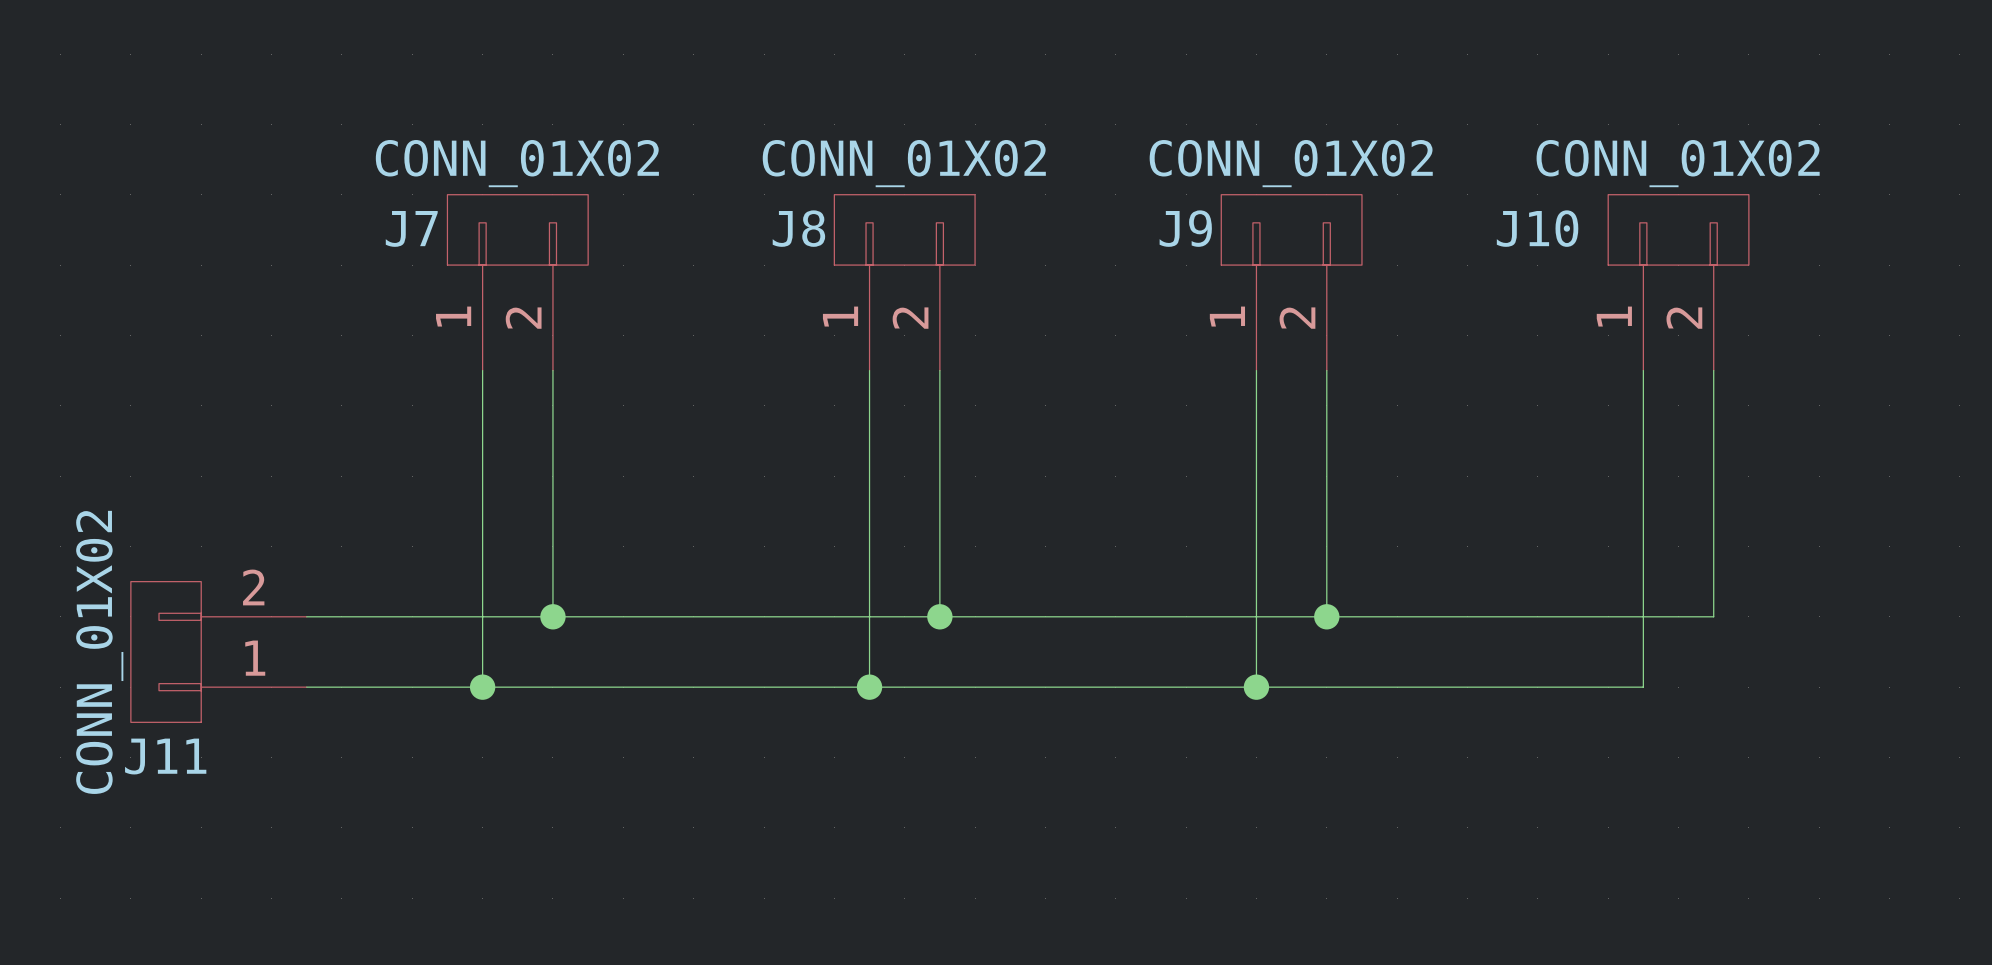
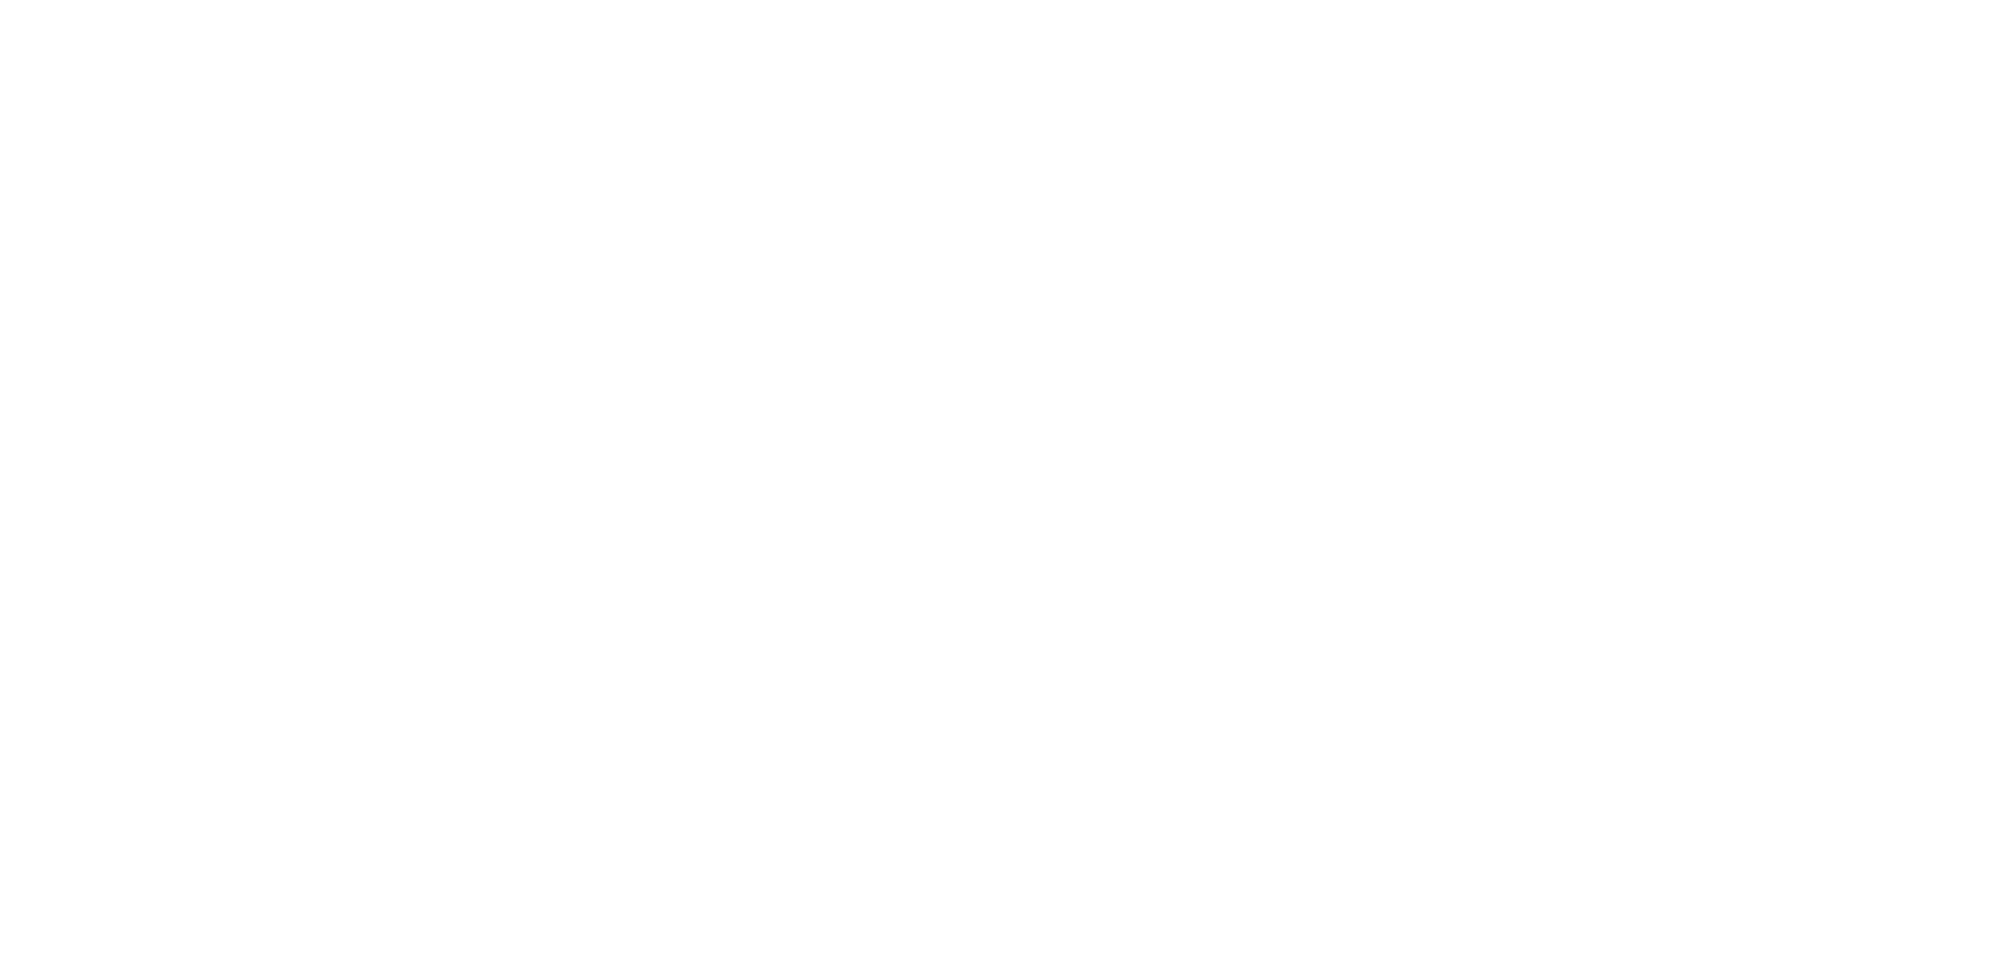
J7: CONN_01X02 (517, 282) -> none
J8: CONN_01X02 (904, 282) -> none
J9: CONN_01X02 (1291, 282) -> none
J10: CONN_01X02 (1678, 282) -> none
wire: (482, 370) (482, 687) -> none
wire: (552, 370) (552, 616) -> none
wire: (869, 370) (869, 687) -> none
wire: (939, 370) (939, 616) -> none
wire: (1256, 370) (1256, 687) -> none
wire: (1326, 370) (1326, 616) -> none
wire: (1643, 370) (1643, 687) (306, 687) -> none
wire: (1713, 370) (1713, 616) (306, 616) -> none
junction: (552, 616) -> none
junction: (939, 616) -> none
junction: (1326, 616) -> none
J11: CONN_01X02 (218, 651) -> none
junction: (482, 687) -> none
junction: (869, 687) -> none
junction: (1256, 687) -> none

